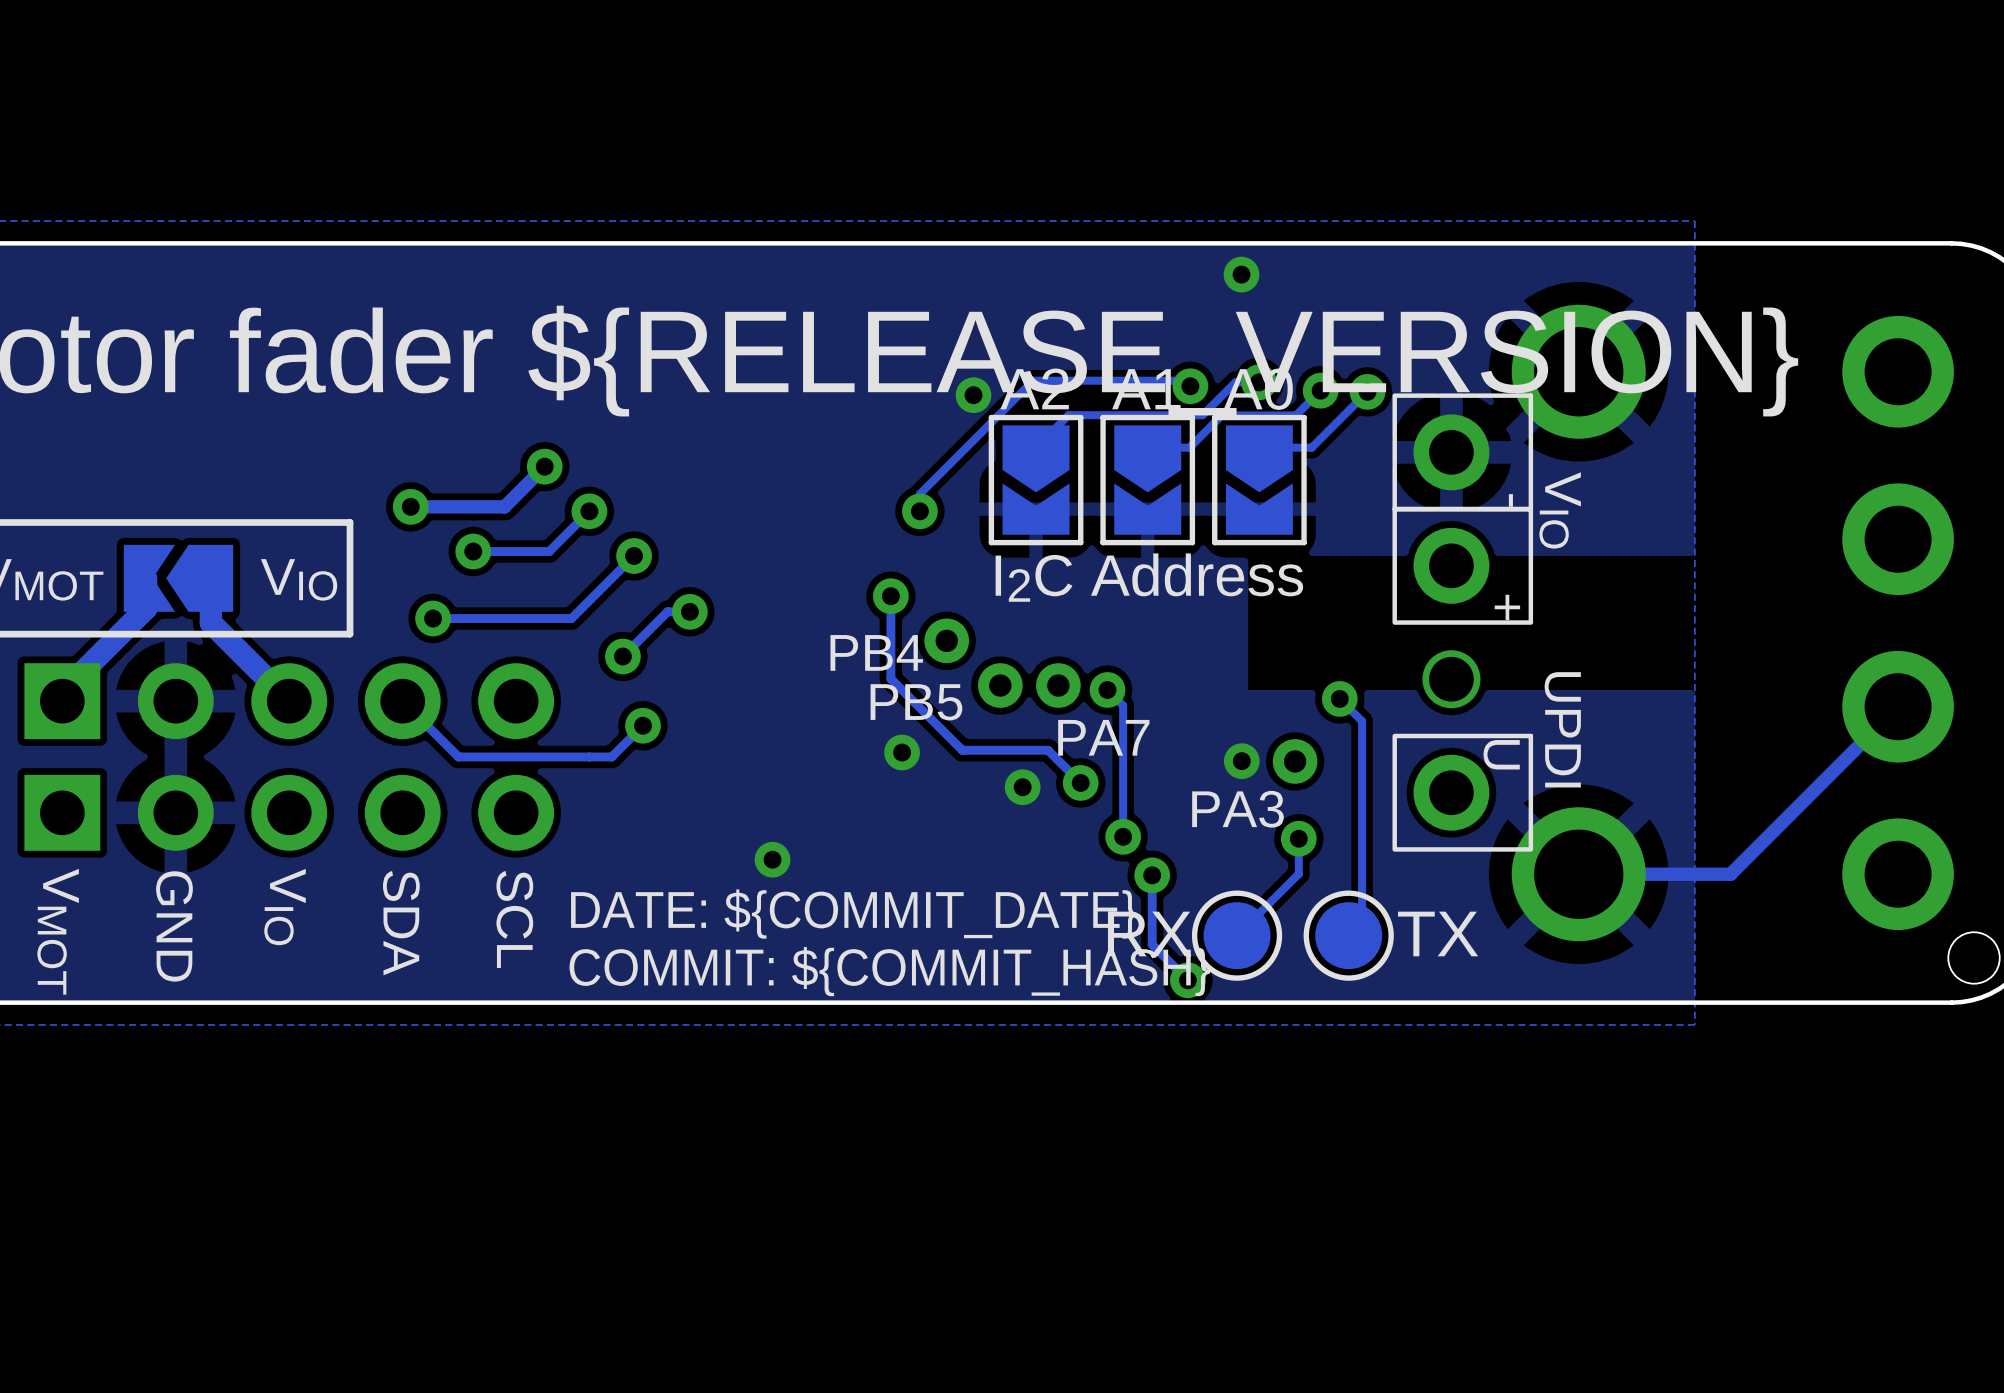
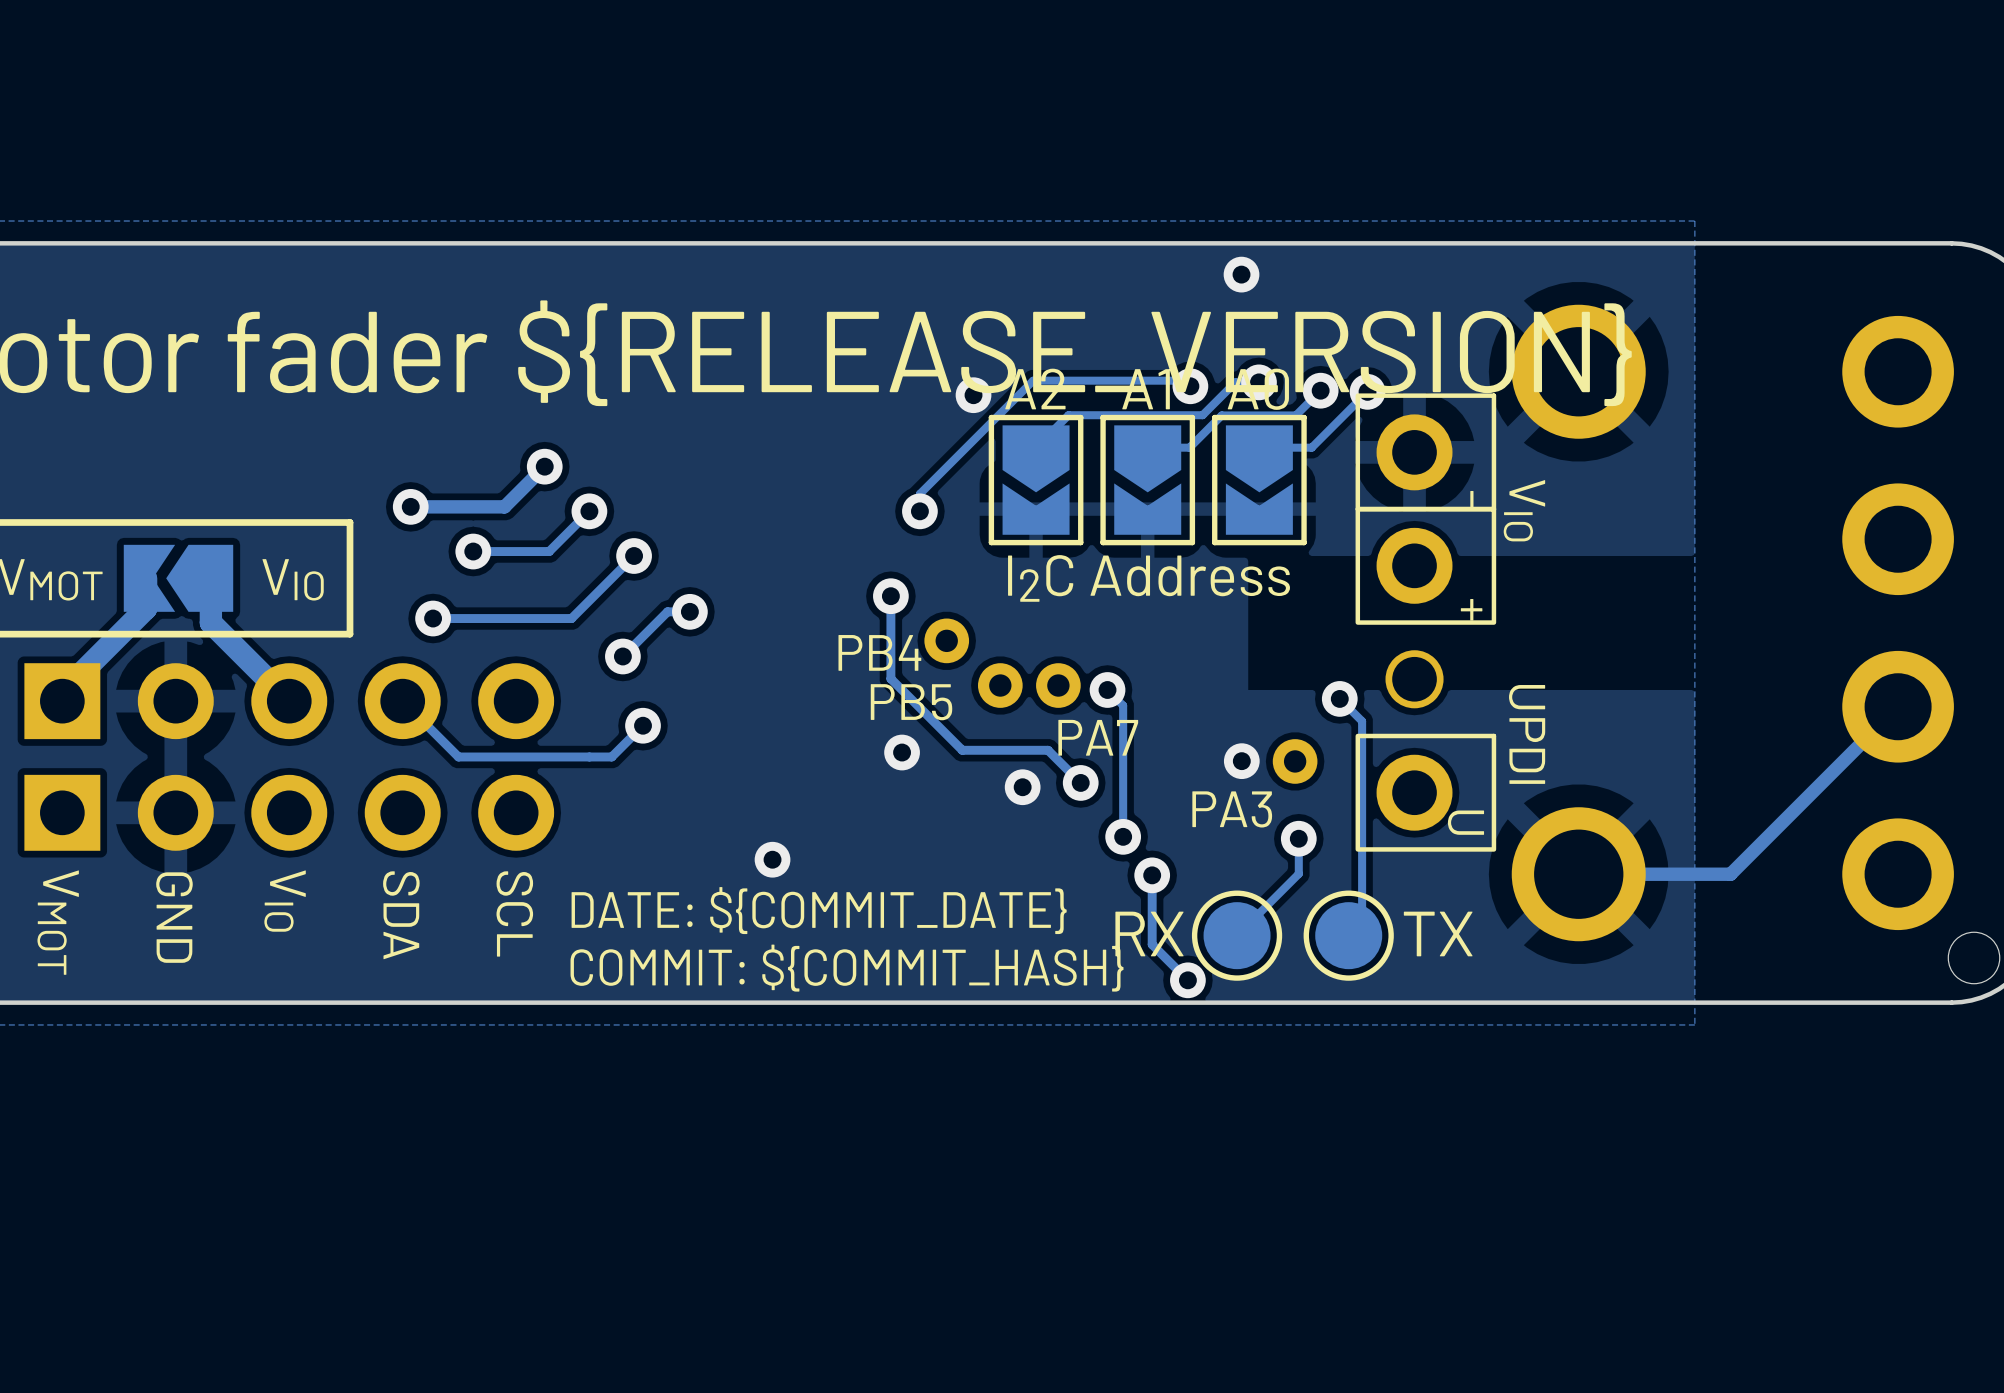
text position: VIO (1560, 510) -> VIO (1524, 510)
part position: (1462, 622) -> (1425, 622)
text position: UPDI (1562, 729) -> UPDI (1527, 734)
part text position: U (1501, 754) -> U (1465, 822)

